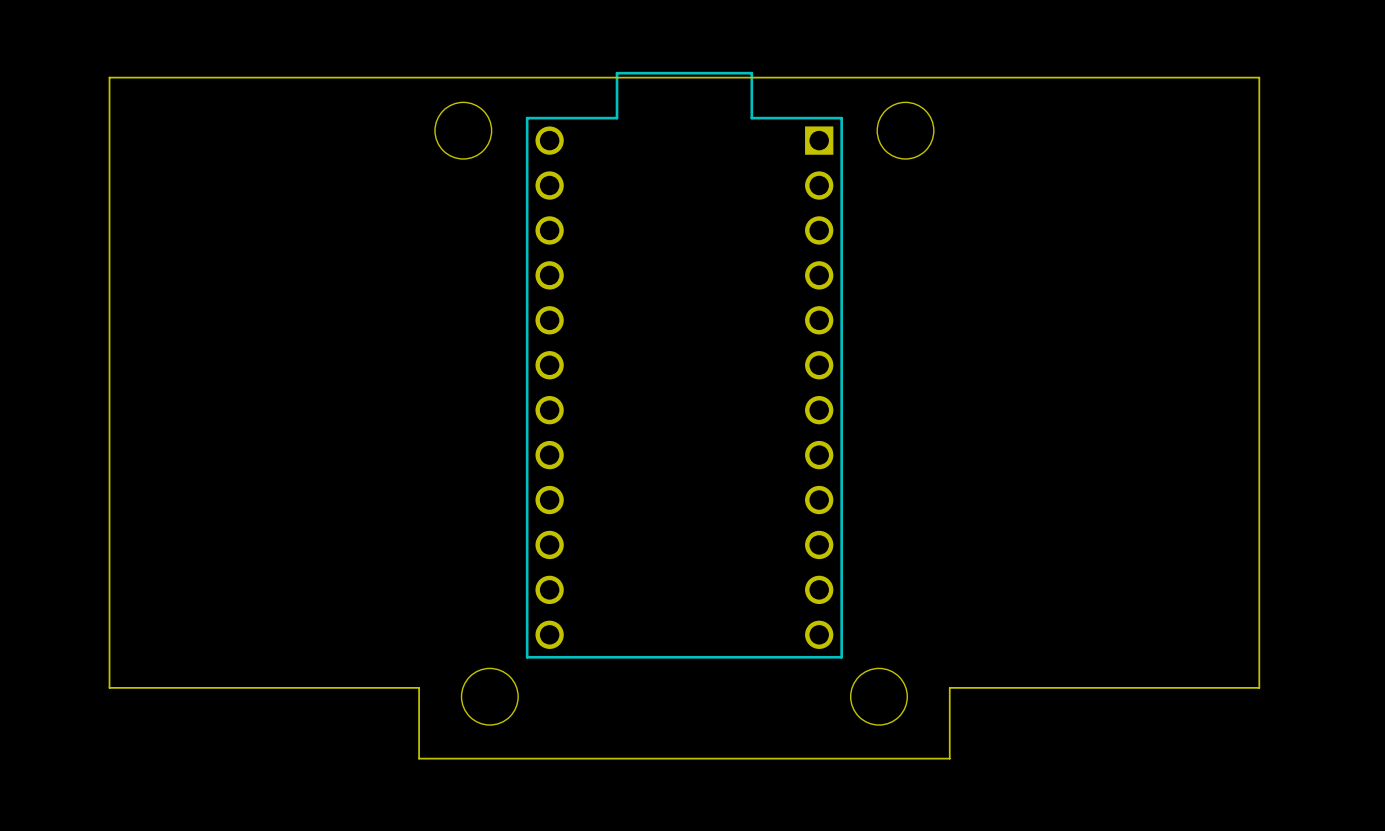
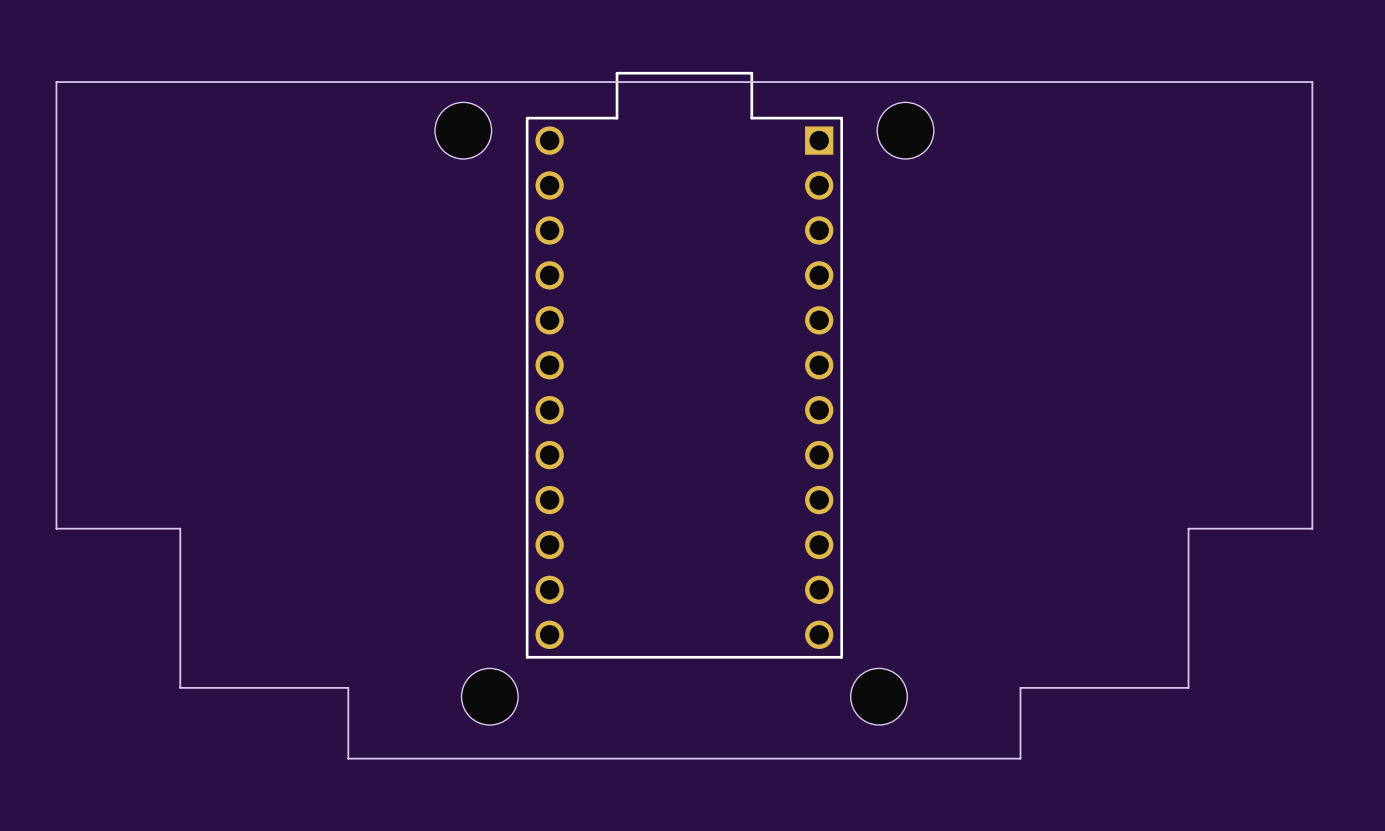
board edge: (348, 687) (419, 687) (419, 758) -> (348, 687) (348, 758) (419, 758)
board edge: (1020, 687) (949, 687) (949, 758) -> (1020, 687) (1020, 758) (949, 758)
board edge: (1188, 687) (1259, 687) (1259, 77) (109, 77) (109, 687) (180, 687) -> (1188, 687) (1188, 528) (1312, 528) (1312, 82) (56, 82) (56, 528) (180, 528) (180, 687)

